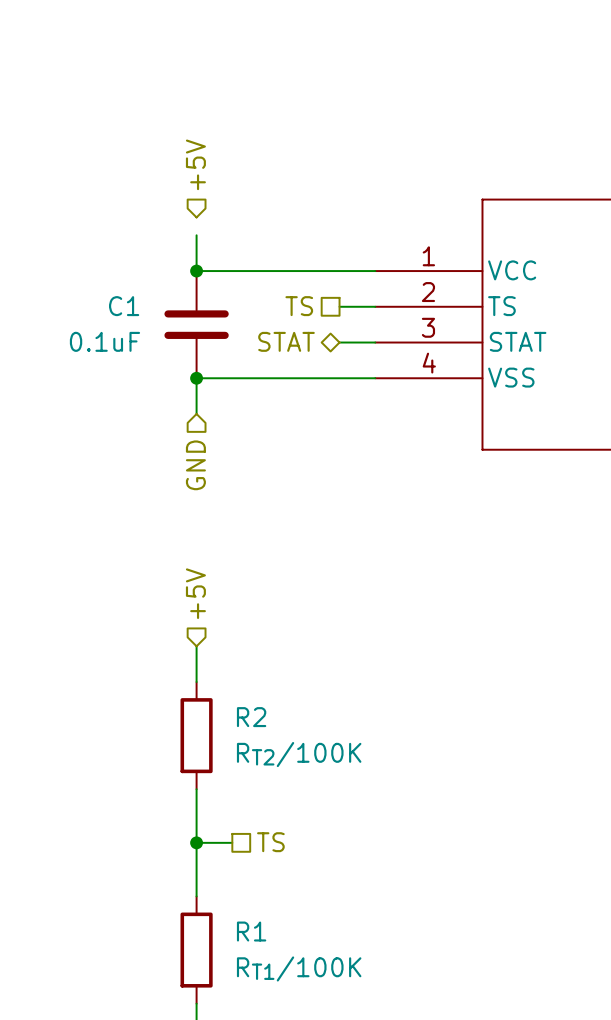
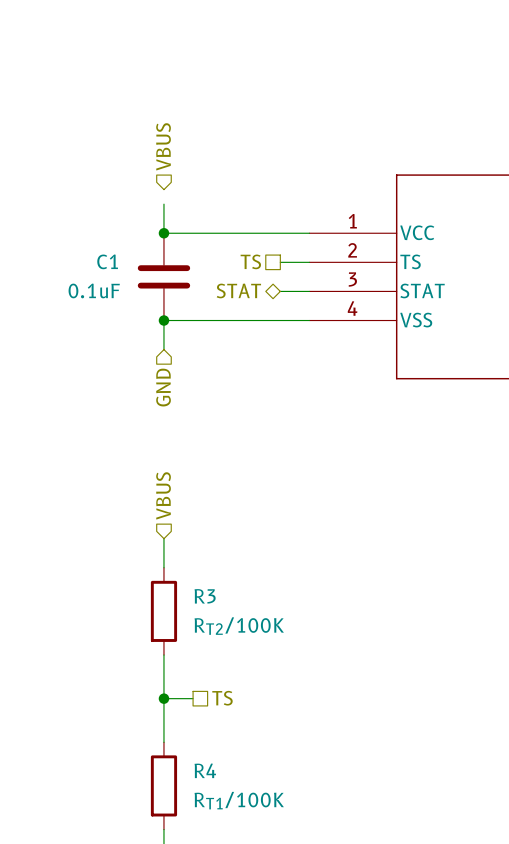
hierarchical label: +5V (195, 164) -> VBUS (163, 146)
hierarchical label: +5V (195, 593) -> VBUS (163, 495)
R2 name: R2 (251, 717) -> R3 (205, 596)
R1 name: R1 (251, 931) -> R4 (205, 770)

